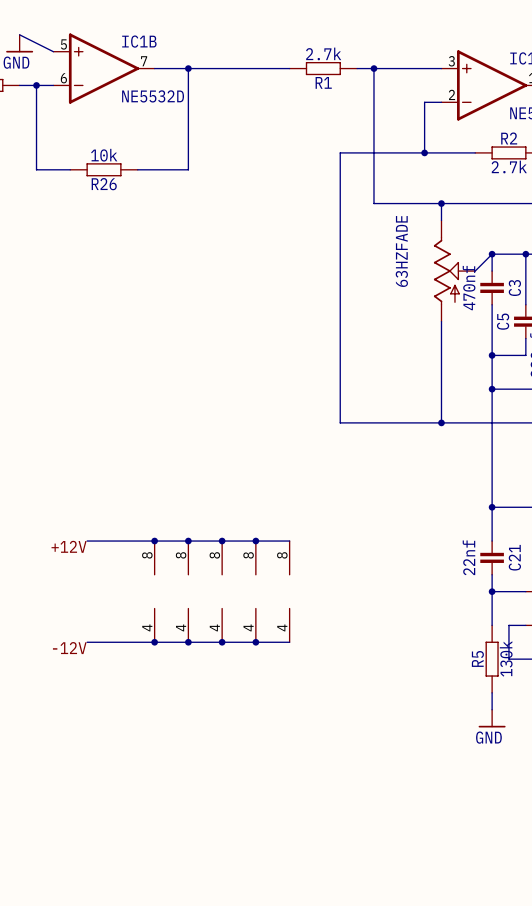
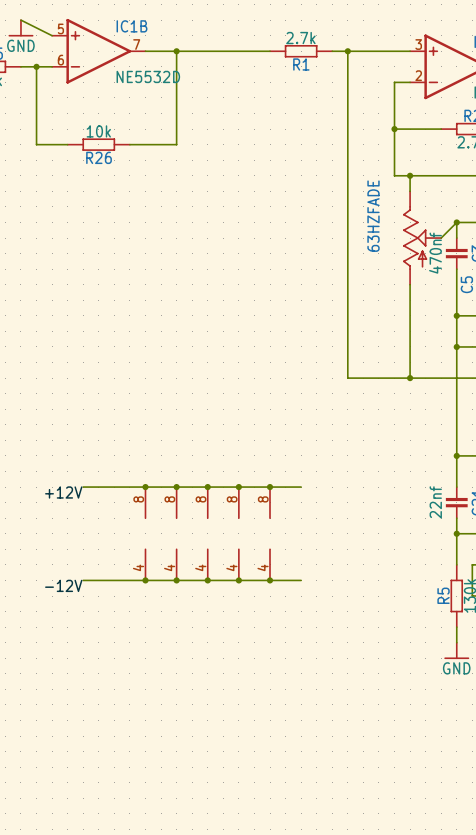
wire: (424, 152) (340, 152) (340, 422) (373, 422) -> (347, 175) (347, 378)
wire: (373, 203) (424, 203) -> (394, 129) (394, 175)
wire: none -> (270, 487) (301, 487)
junction: none -> (270, 487)
wire: none -> (270, 580) (301, 580)
junction: none -> (270, 580)

